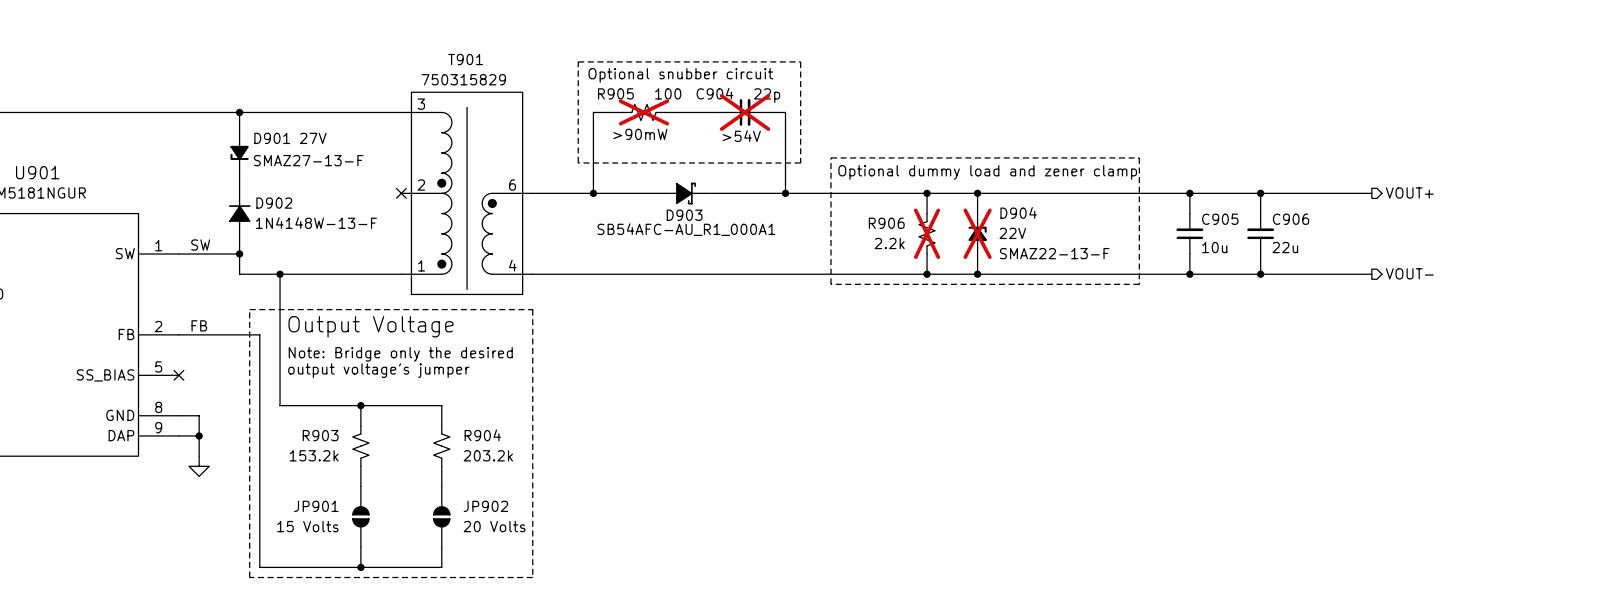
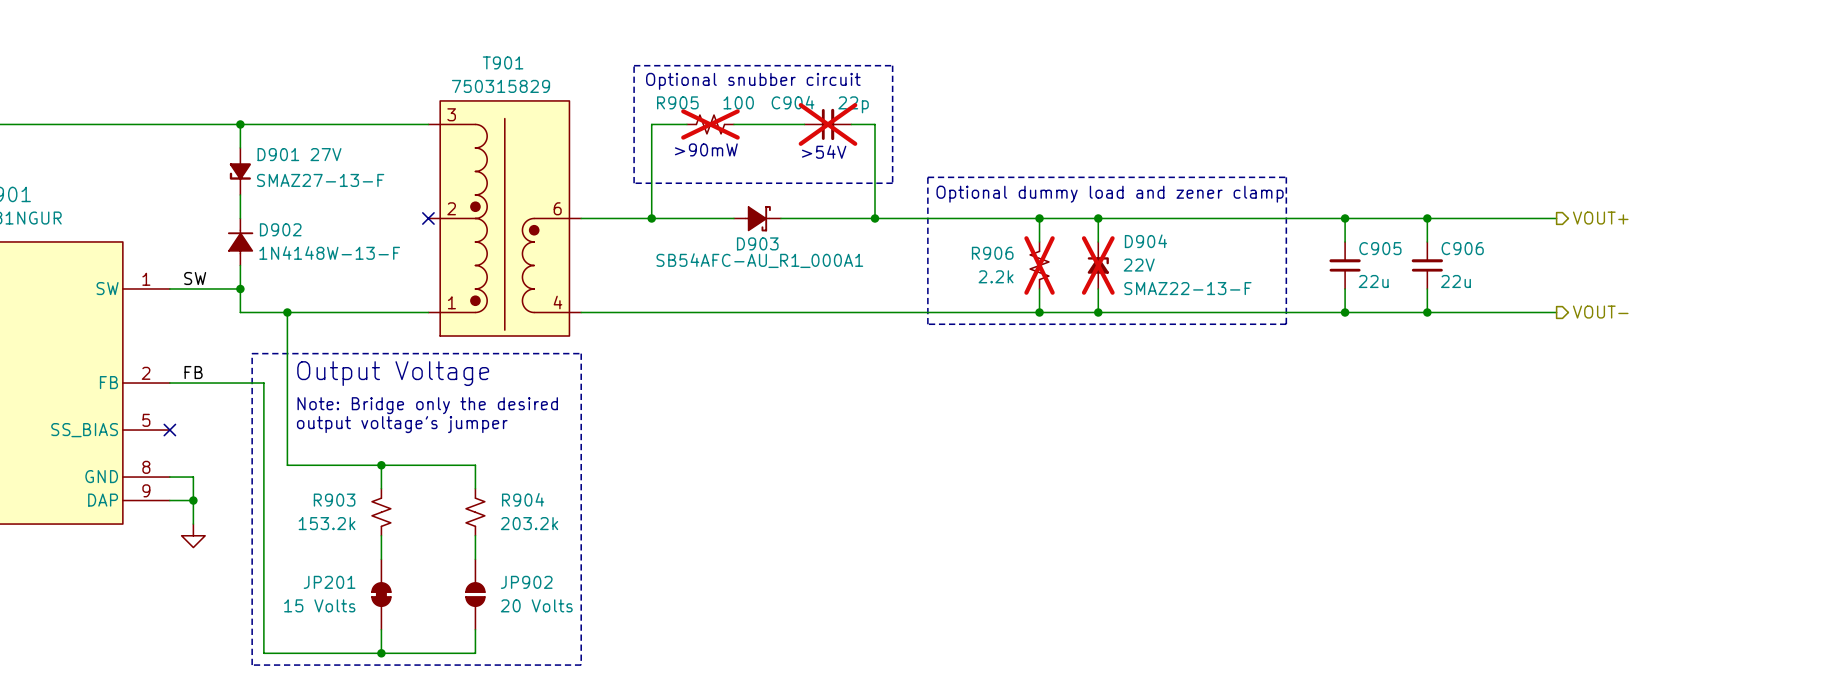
C905 value: 10u (1214, 247) -> 22u (1373, 281)
JP901: 15 Volts (360, 516) -> none
JP201: none -> 15 Volts (381, 594)

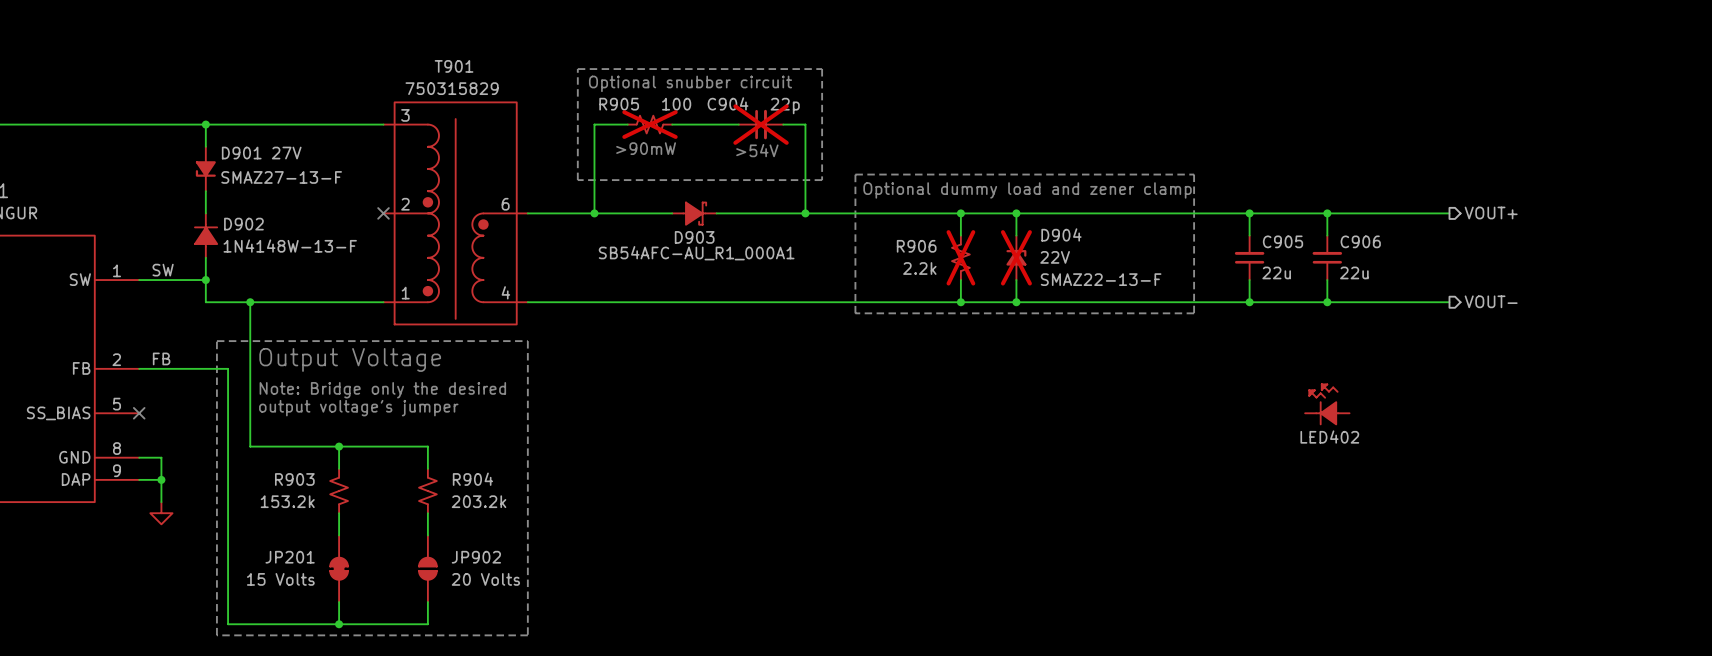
LED402: none -> (1327, 403)

